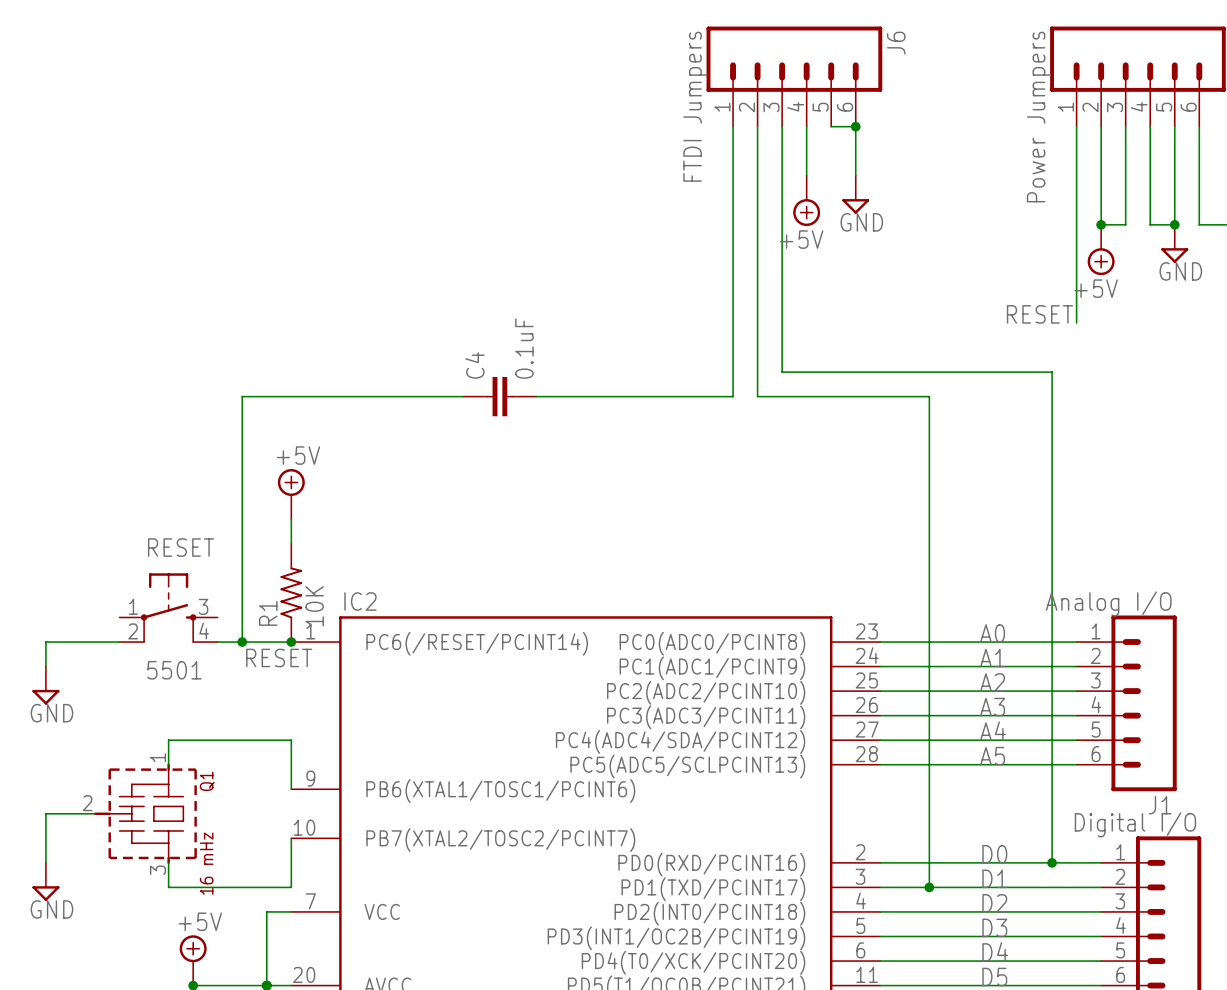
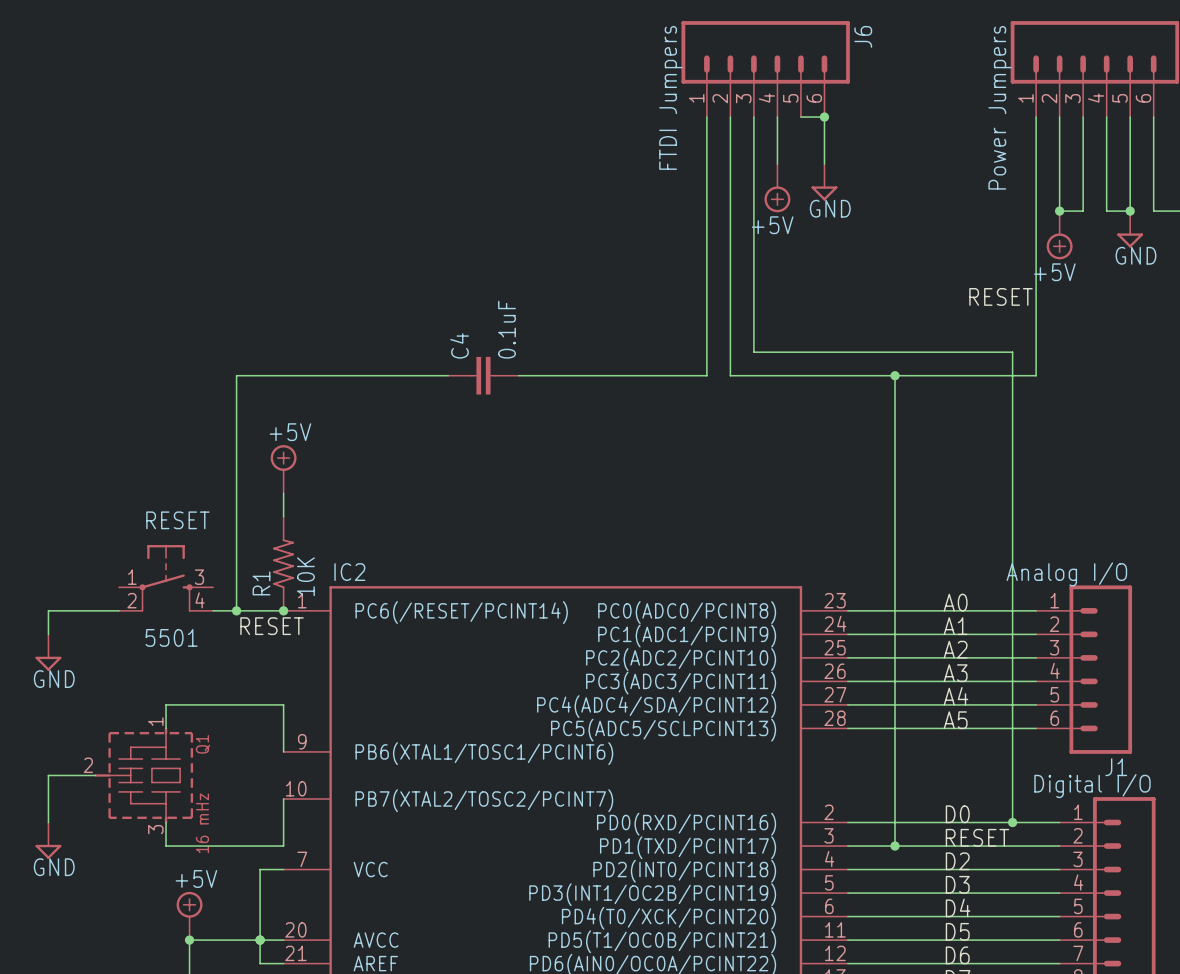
wire: none -> (1036, 305) (1036, 375) (895, 375)
junction: none -> (895, 375)
label: D1 (994, 878) -> RESET (977, 837)

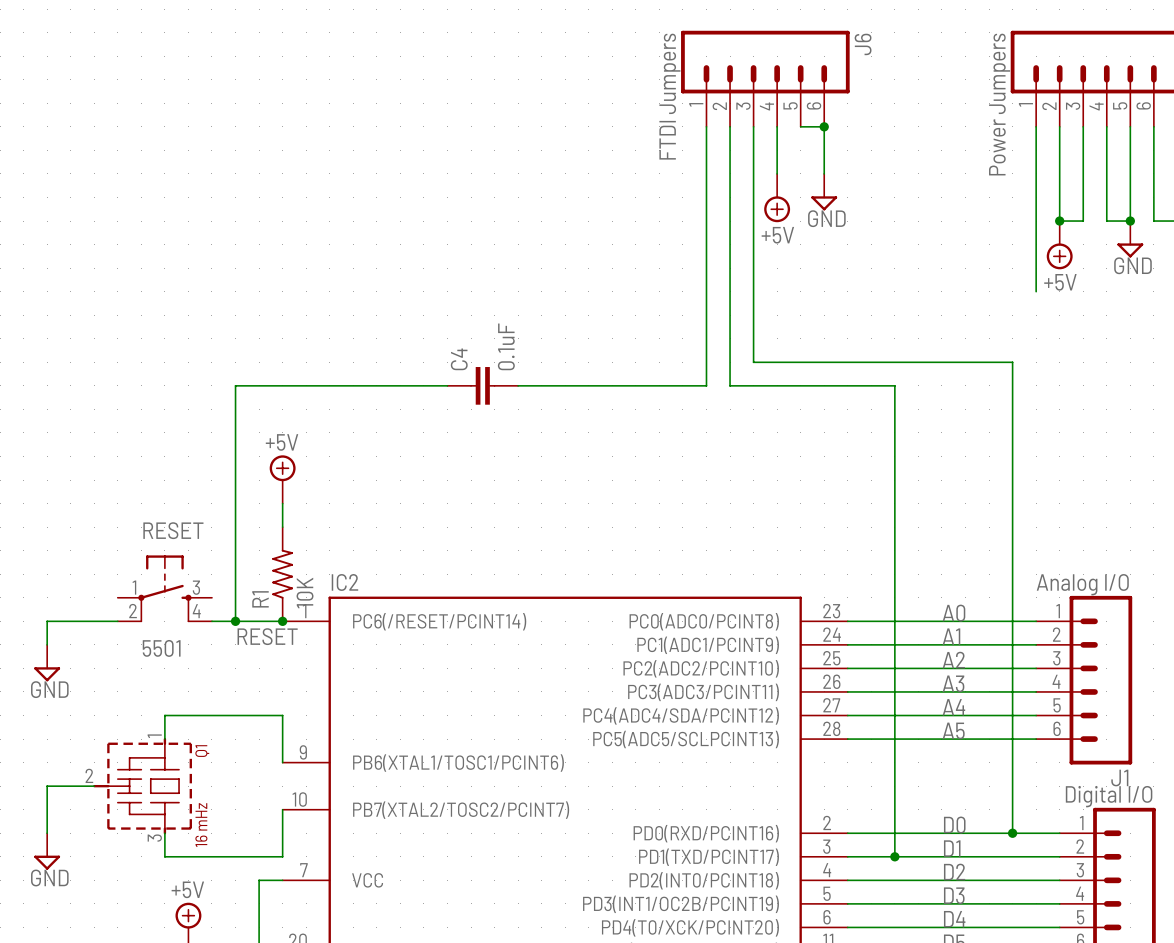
wire: (1036, 281) (1036, 375) (895, 375) -> none
label: RESET (1001, 296) -> none
junction: (895, 375) -> none
label: RESET (977, 837) -> D1 (952, 848)

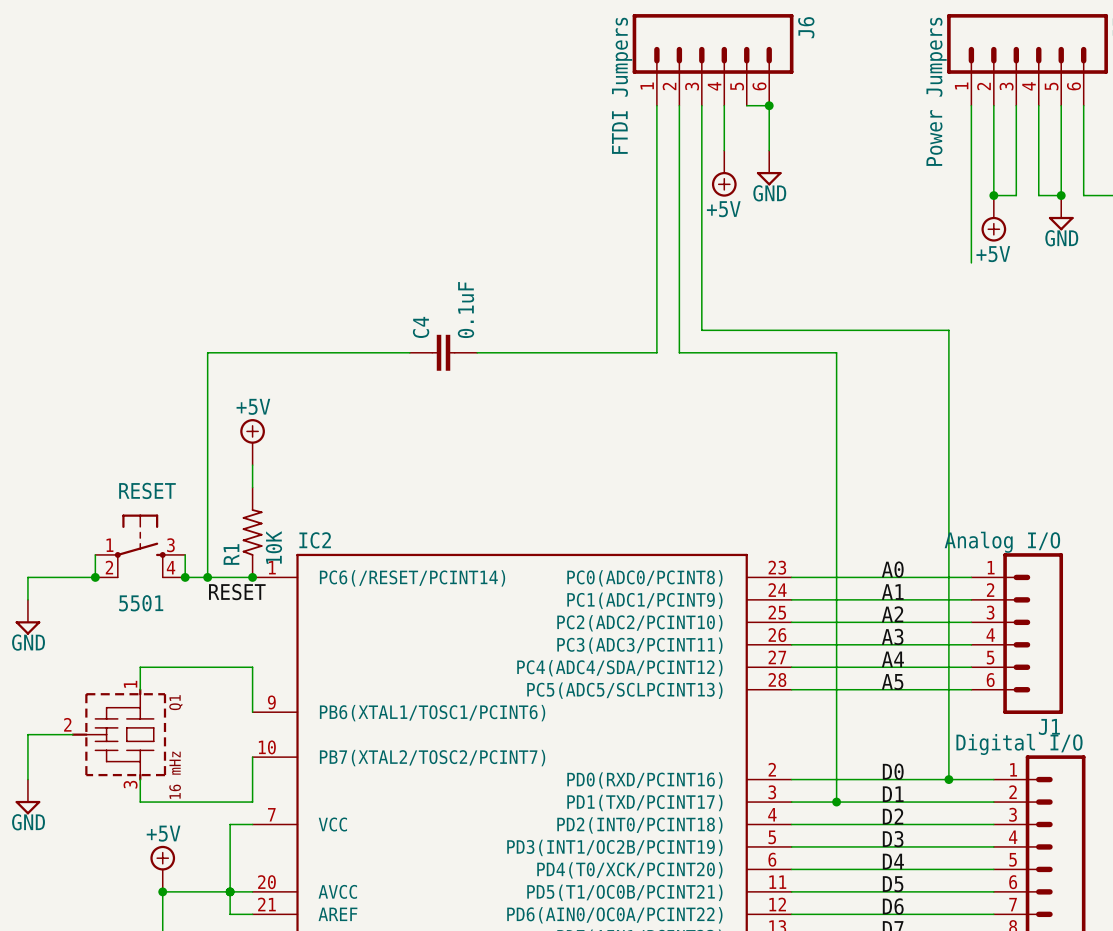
wire: none -> (95, 554) (95, 577)
wire: none -> (185, 554) (185, 577)
junction: none -> (95, 577)
junction: none -> (185, 577)

